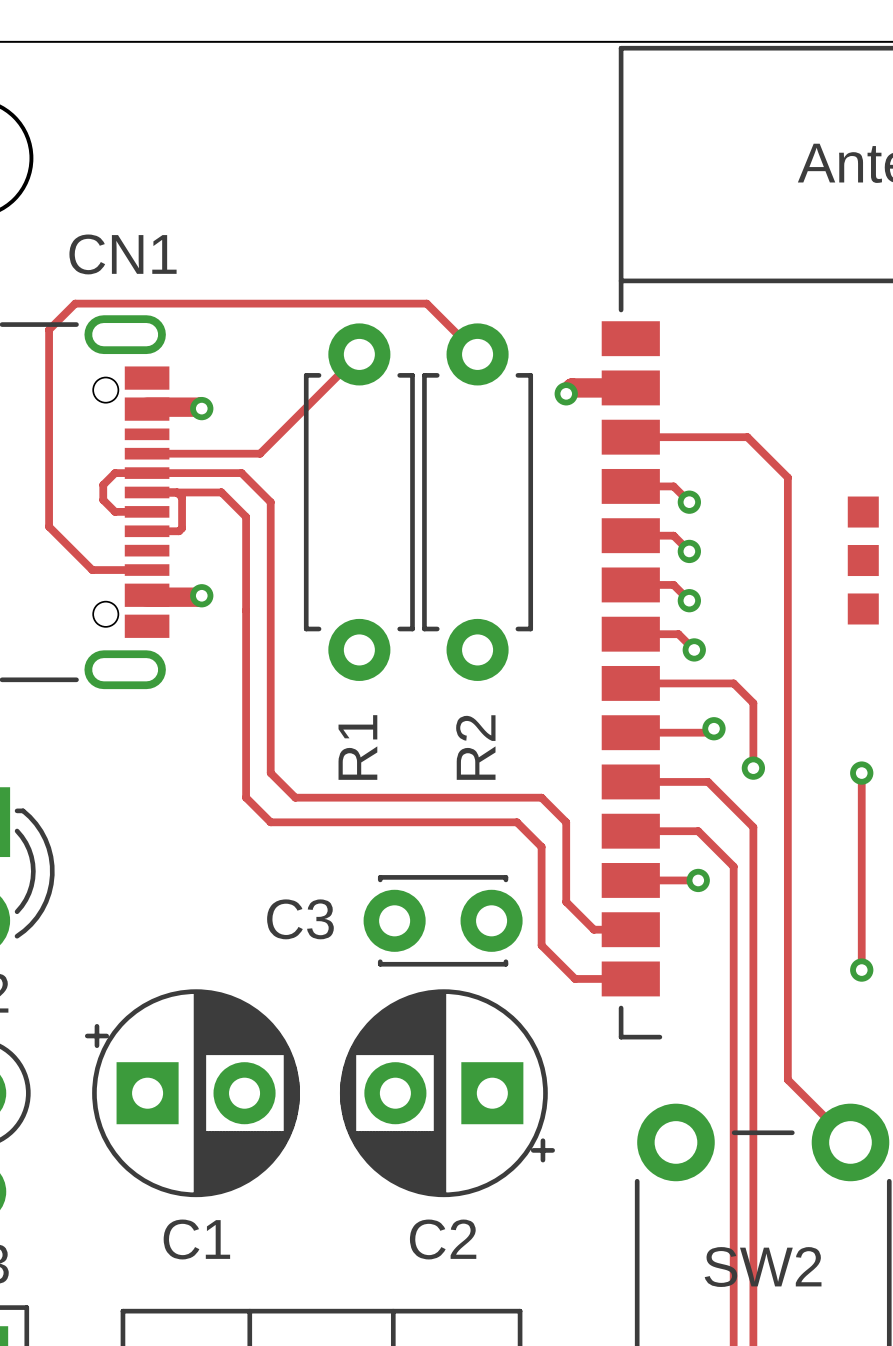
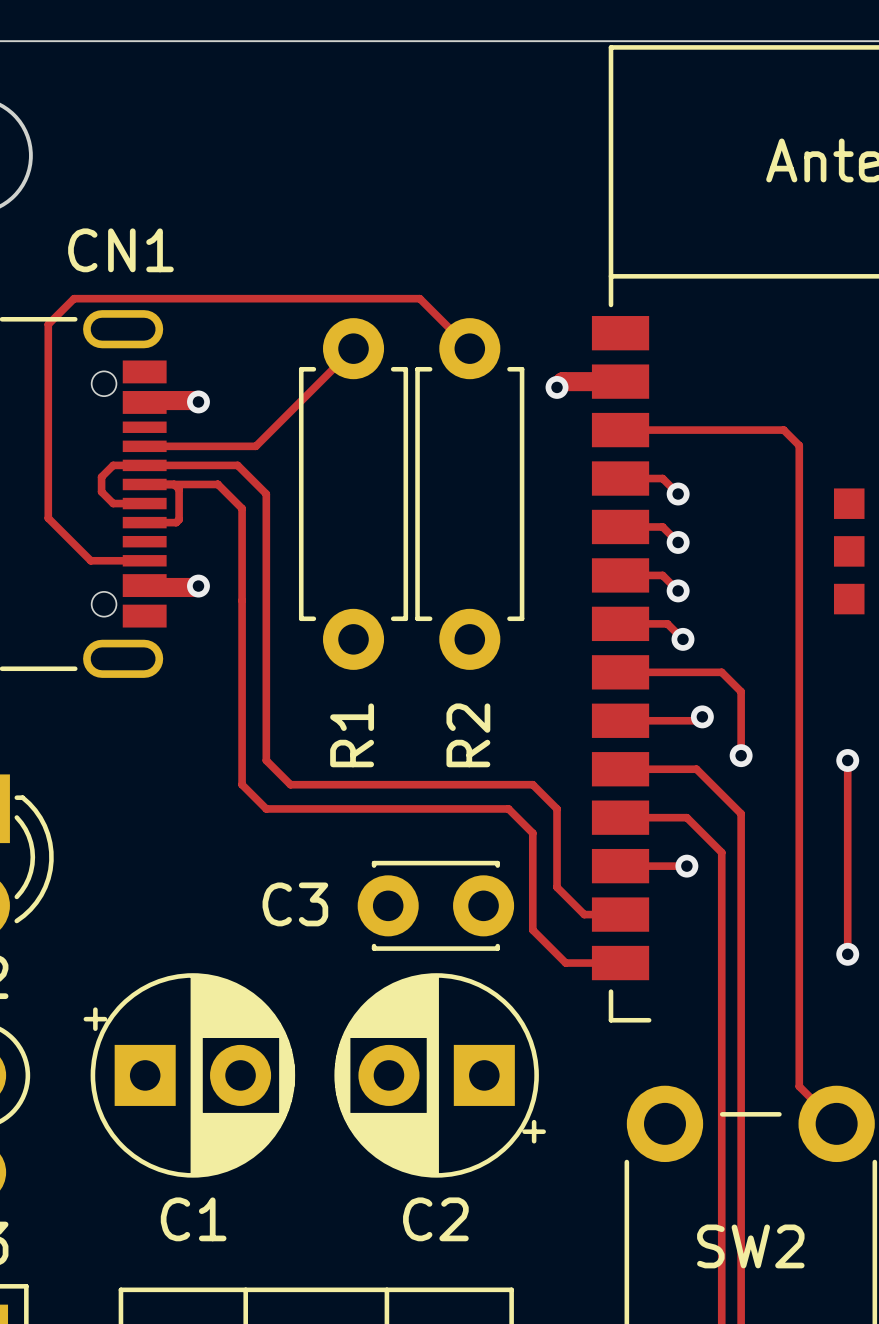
track: (747, 437) (787, 477) (787, 1079) (812, 1104) -> (735, 430) (783, 430) (799, 445) (799, 1086)

